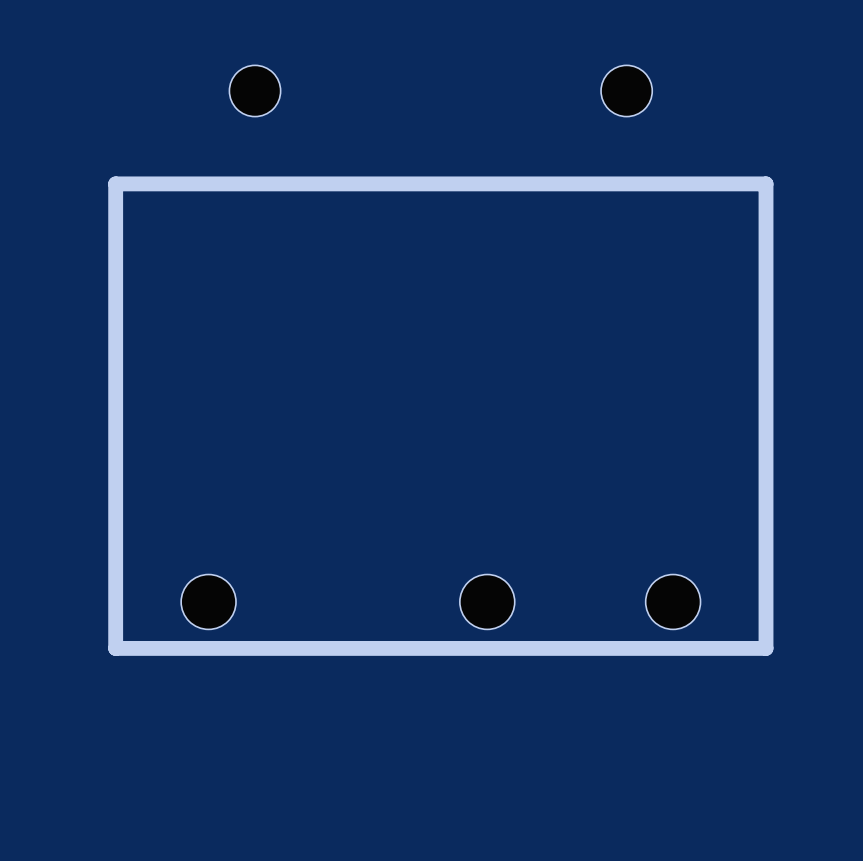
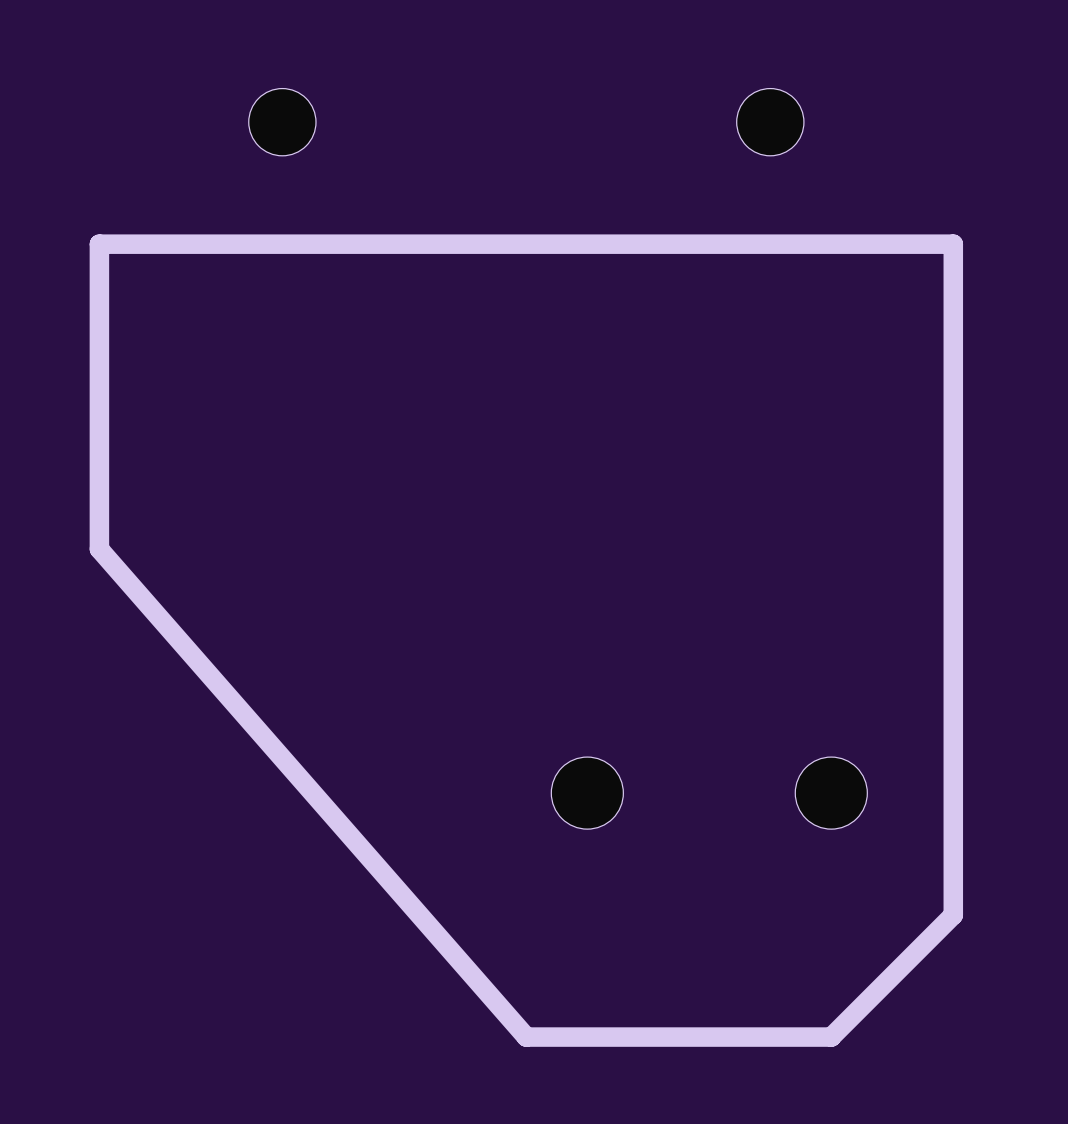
board edge: (115, 416) (115, 648) (766, 648) -> (99, 549) (526, 1037) (831, 1037) (953, 915) (953, 854)
hole: (208, 601) -> none

